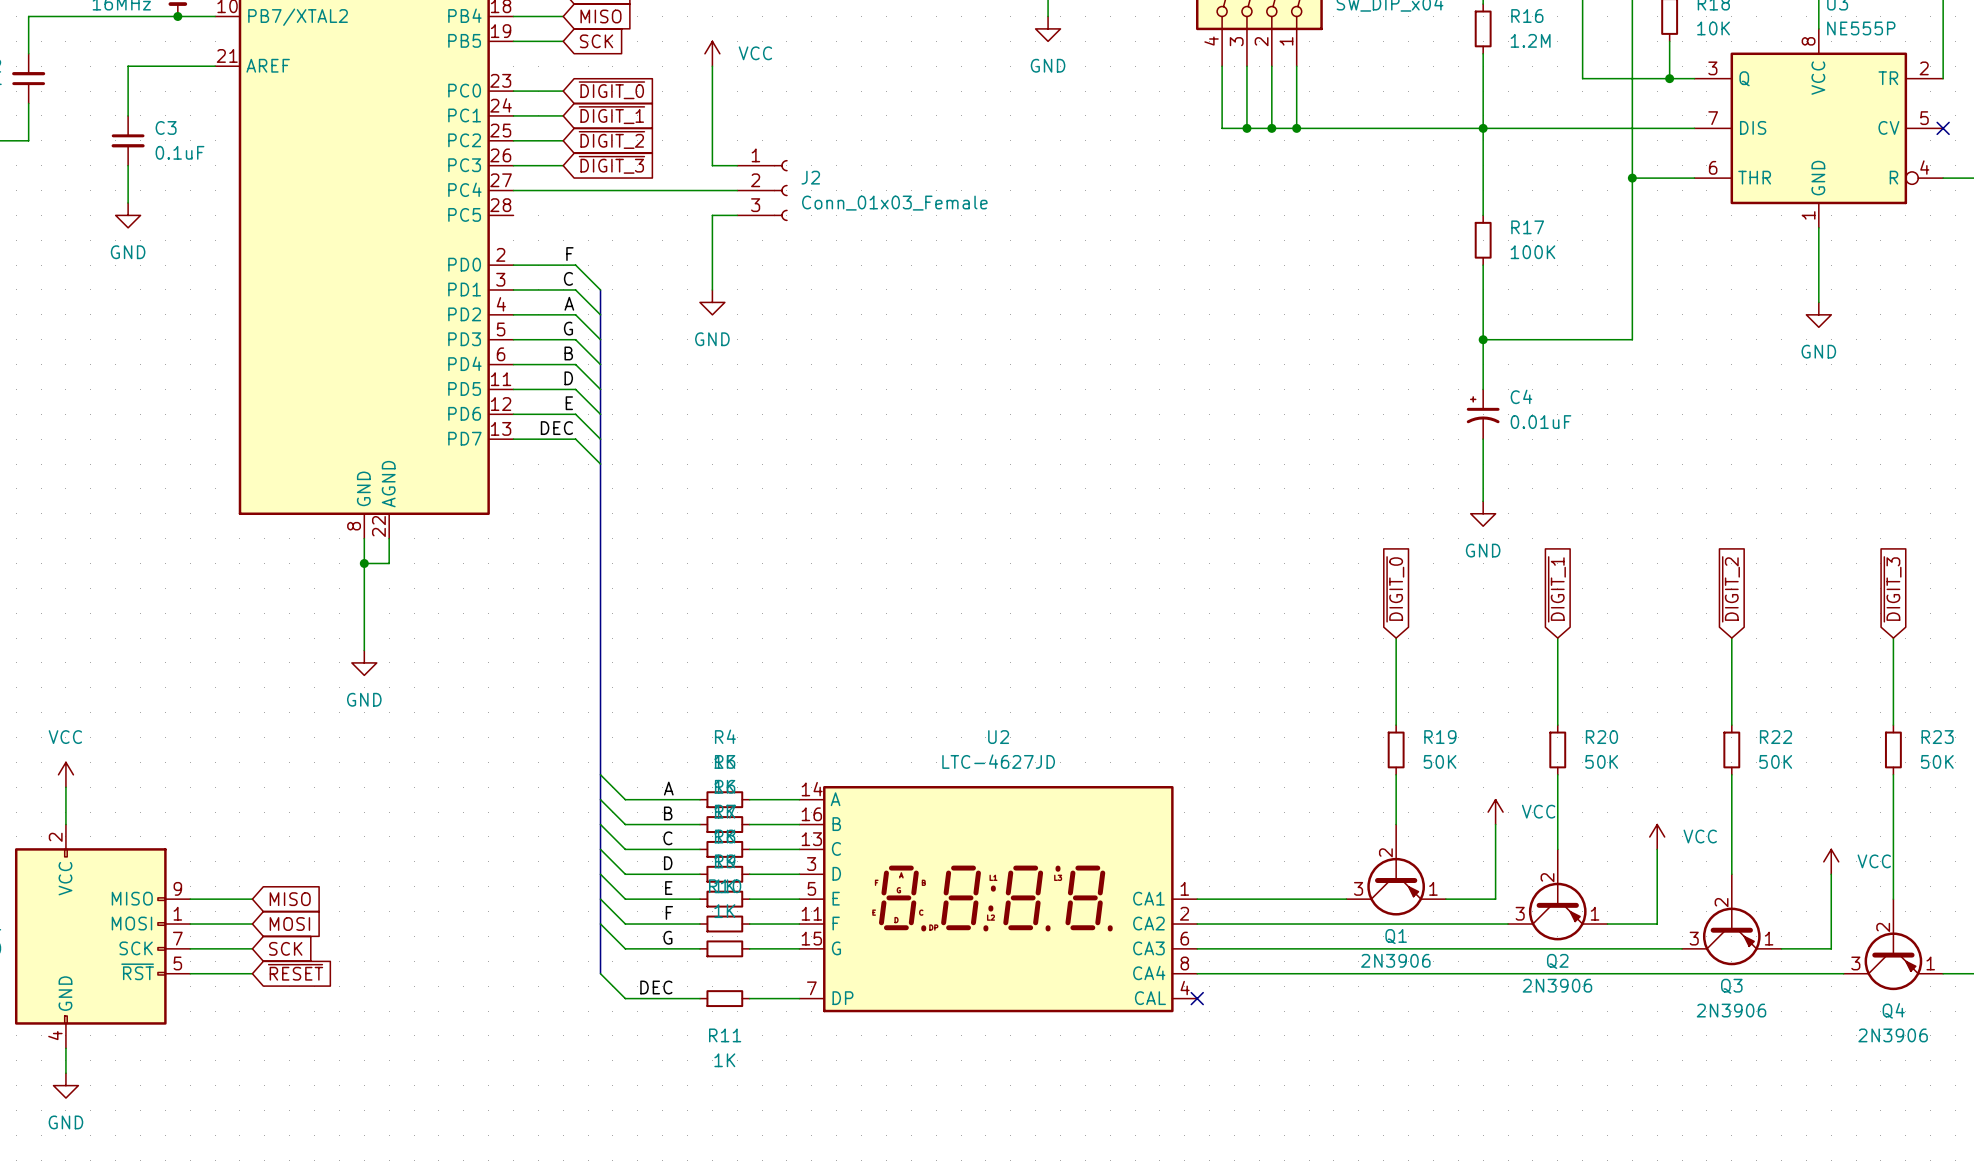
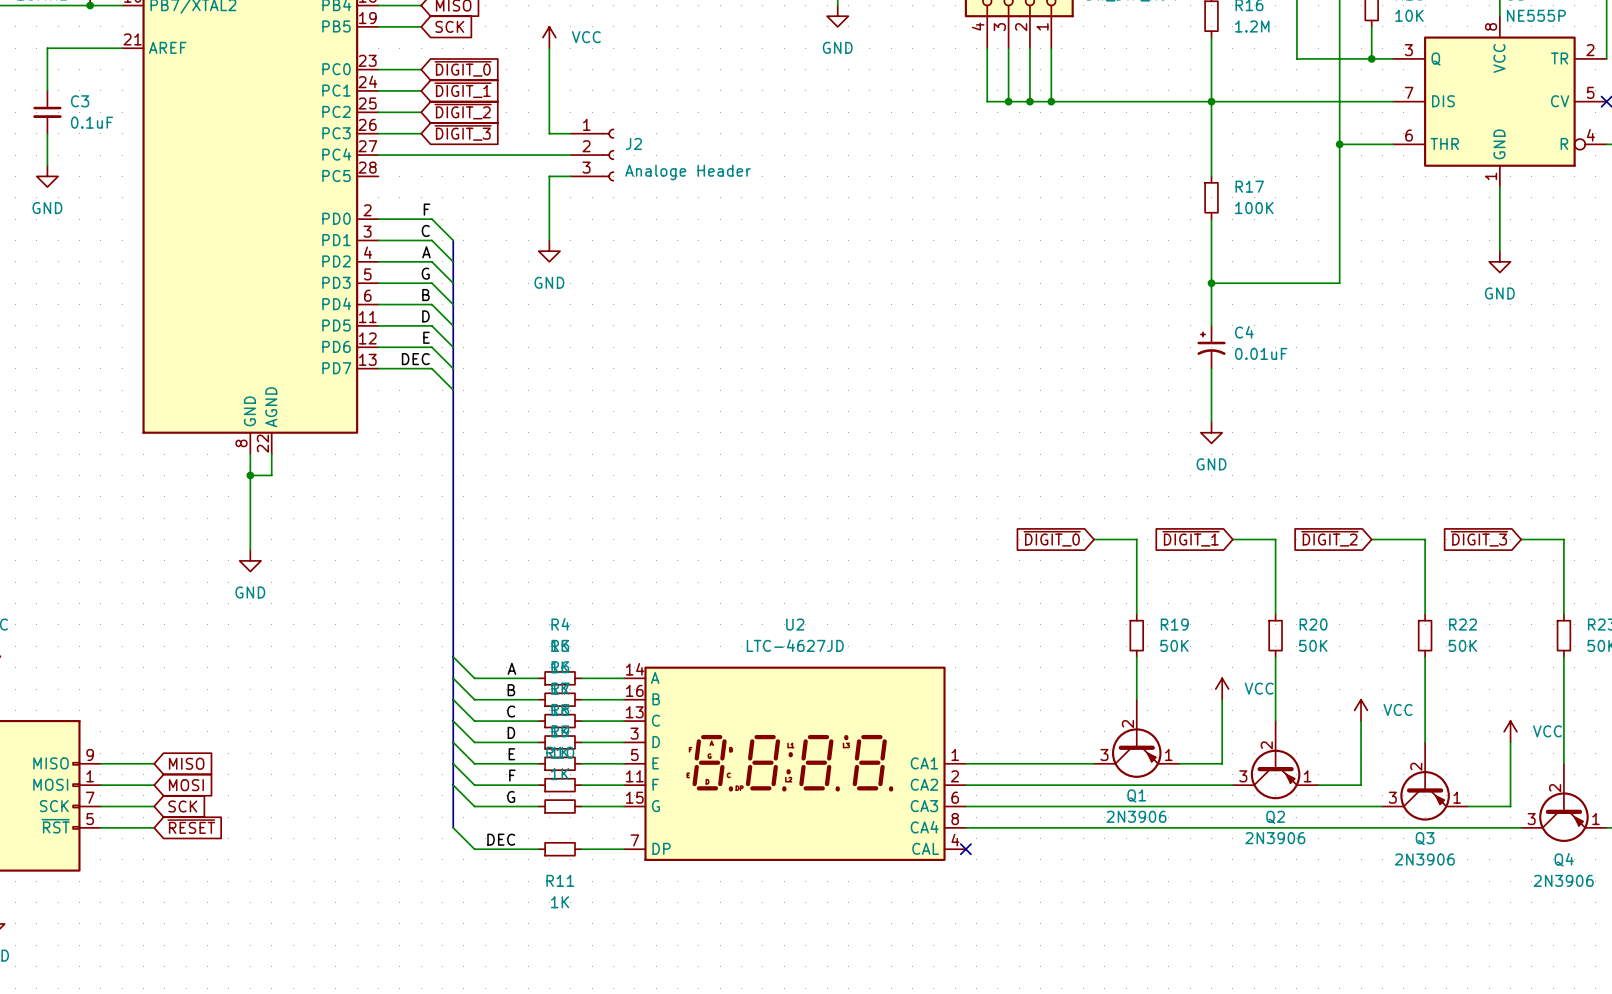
J2 value: Conn_01x03_Female (894, 203) -> Analoge Header (688, 172)
global label rotation: 0° (1395, 589) -> 90° counterclockwise (1052, 538)
global label rotation: 0° (1556, 589) -> 90° counterclockwise (1191, 538)
global label rotation: 0° (1730, 589) -> 90° counterclockwise (1329, 538)
global label position: ~{DIGIT_2} (1730, 589) -> ~{DIGIT_2} (1329, 538)
global label rotation: 0° (1892, 589) -> 90° counterclockwise (1479, 538)
wire: none -> (1094, 539) (1136, 539)
wire: none -> (1232, 539) (1275, 539)
wire: none -> (1371, 539) (1425, 539)
wire: none -> (1521, 539) (1563, 539)

